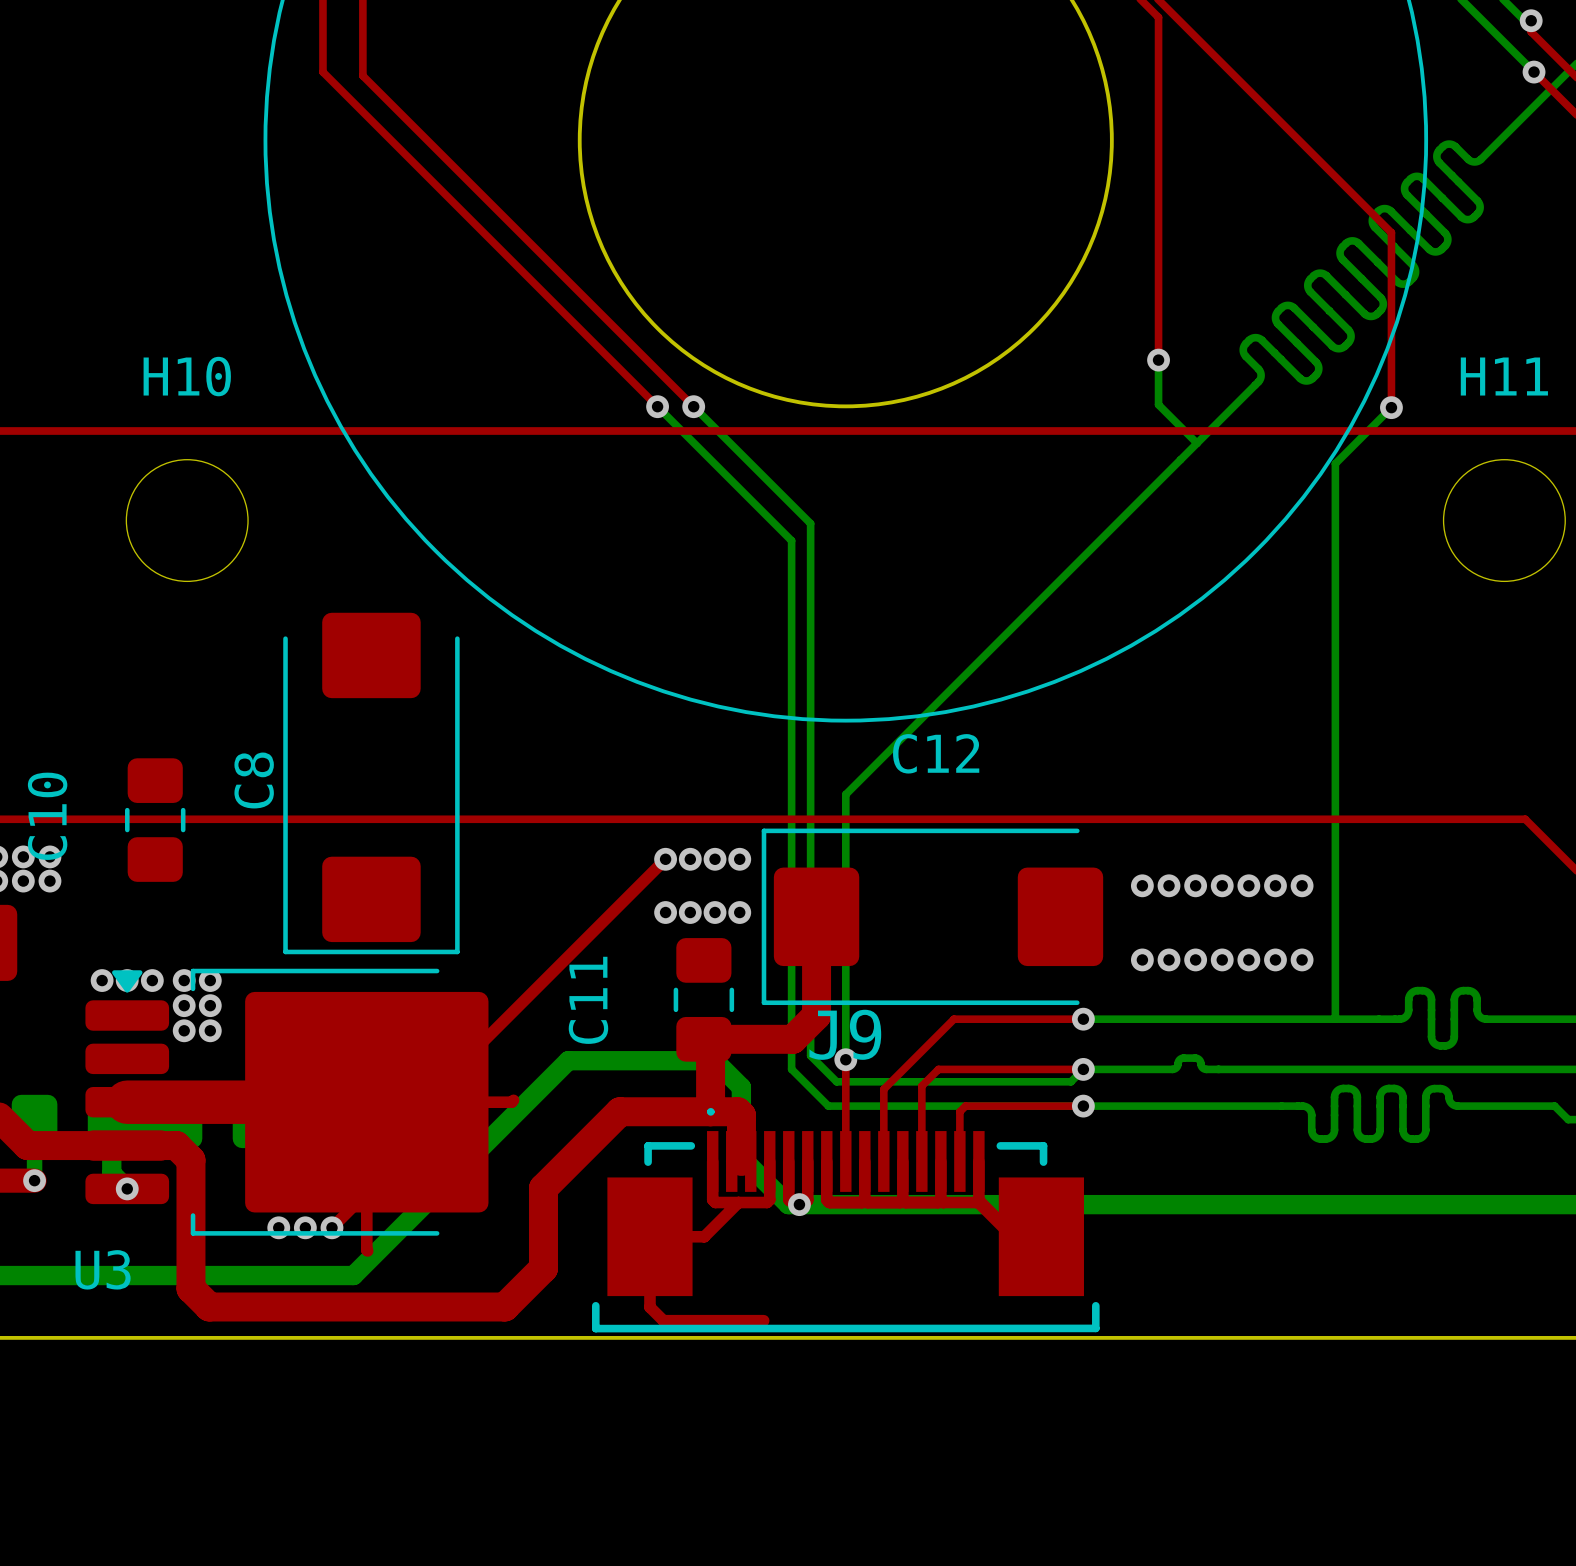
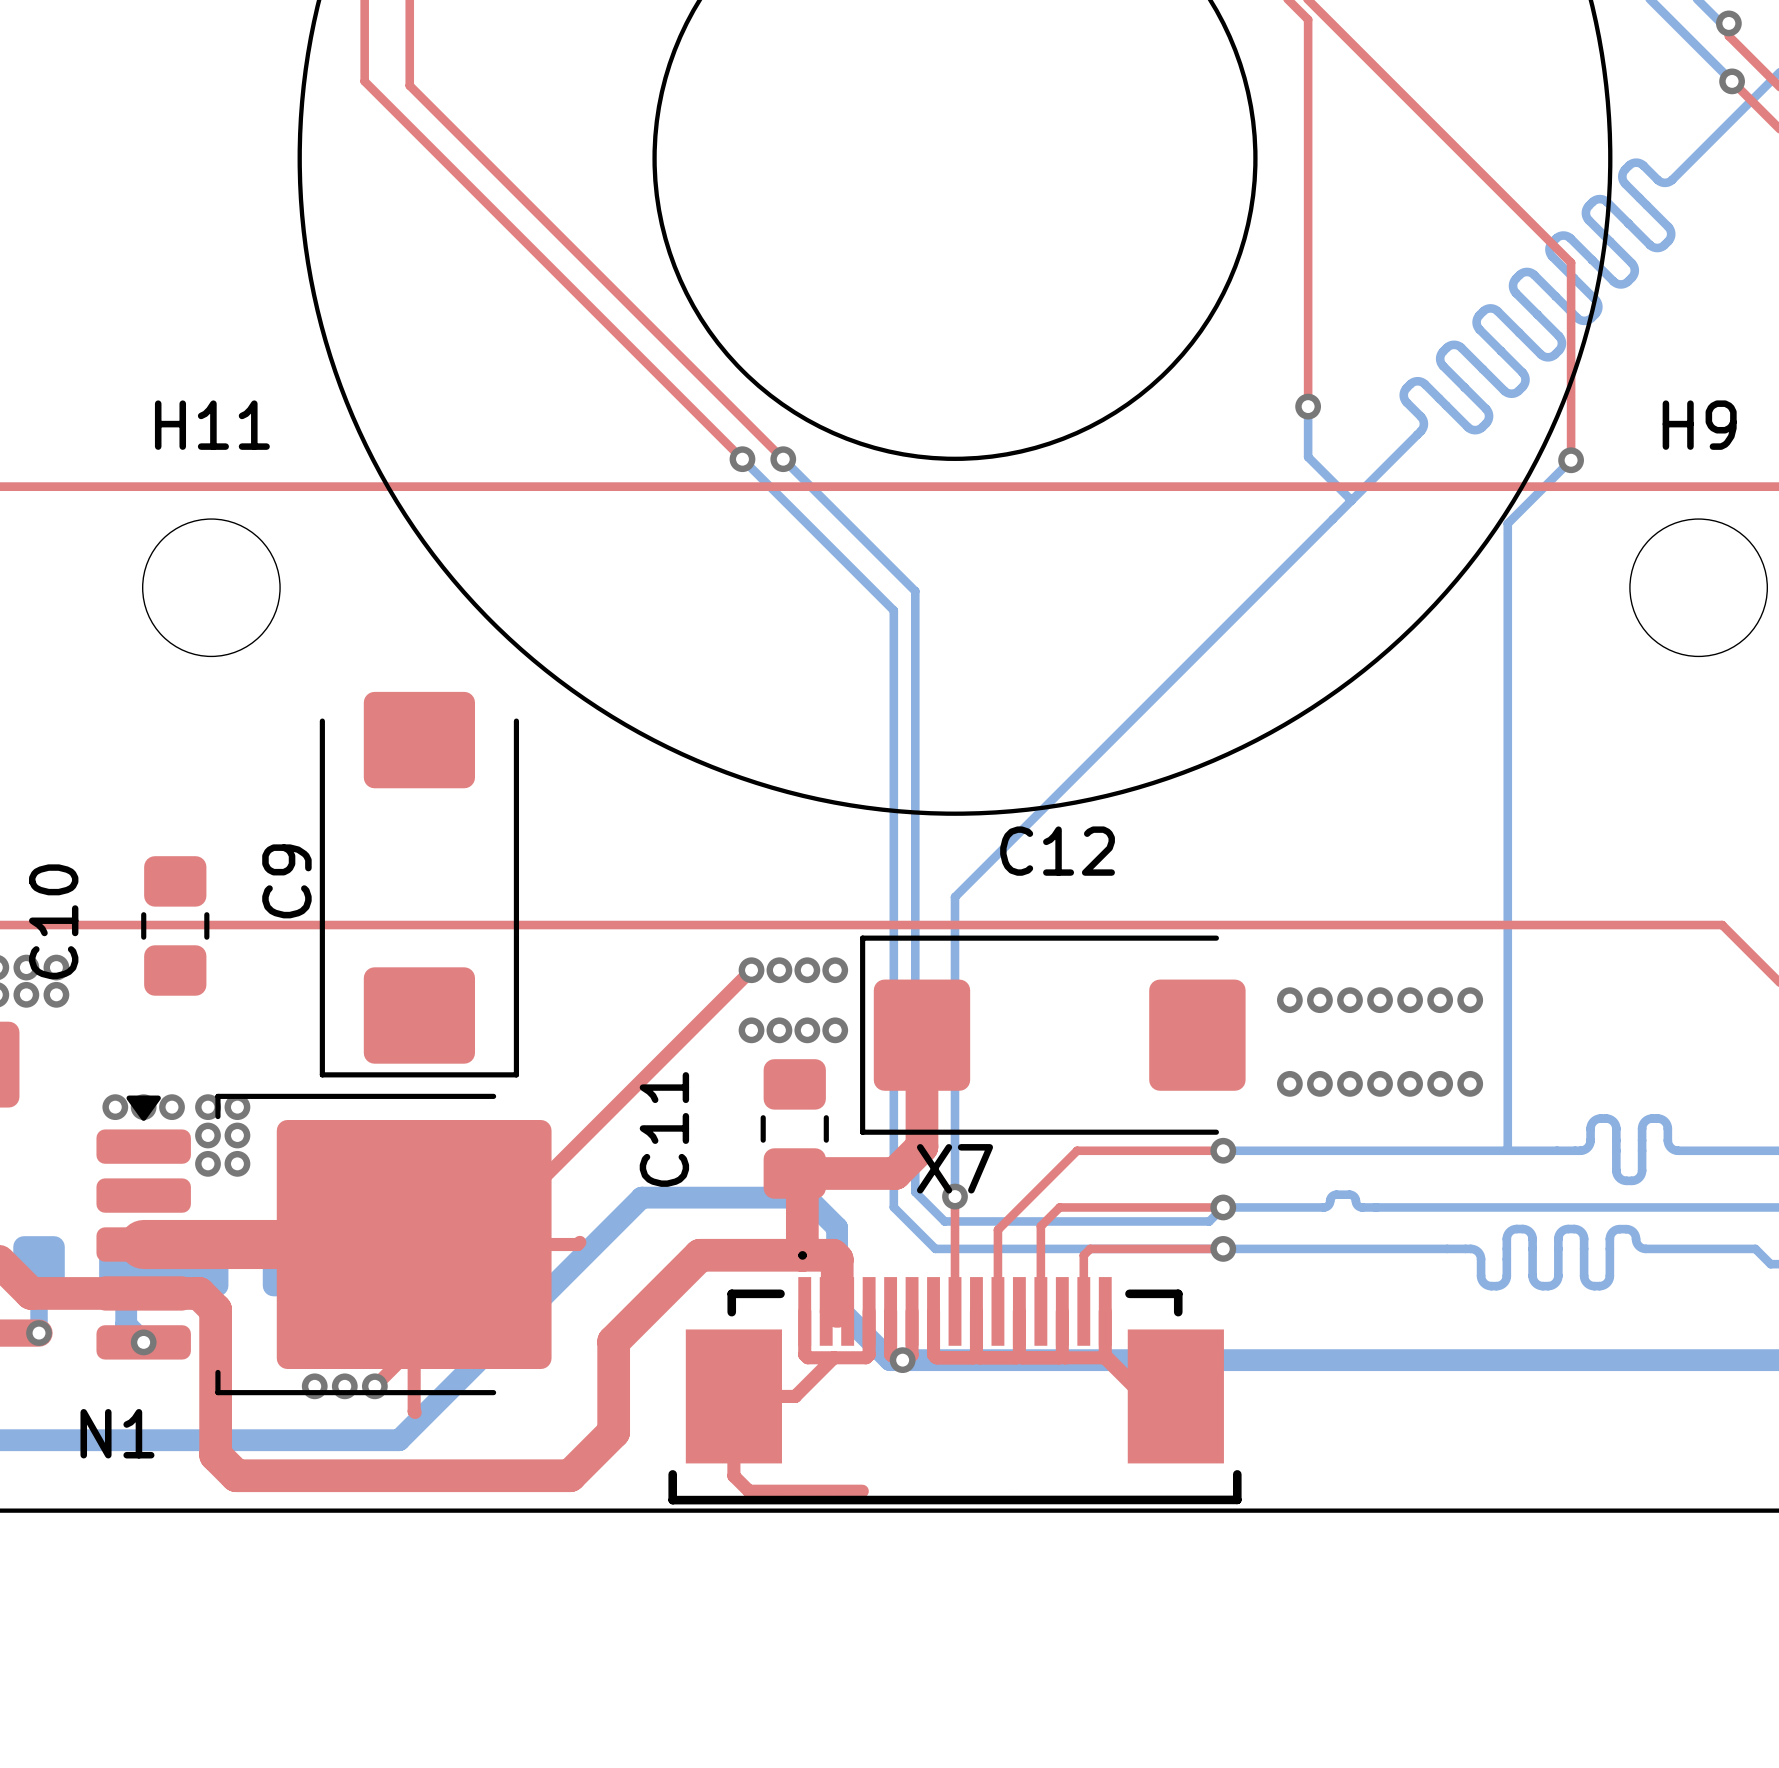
H10 name: H10 (187, 376) -> H11 (212, 425)
H11 name: H11 (1504, 376) -> H9 (1699, 425)
C8 name: C8 (254, 780) -> C9 (286, 881)
J9 name: J9 (845, 1034) -> X7 (955, 1168)
U3 name: U3 (103, 1269) -> N1 (117, 1433)

